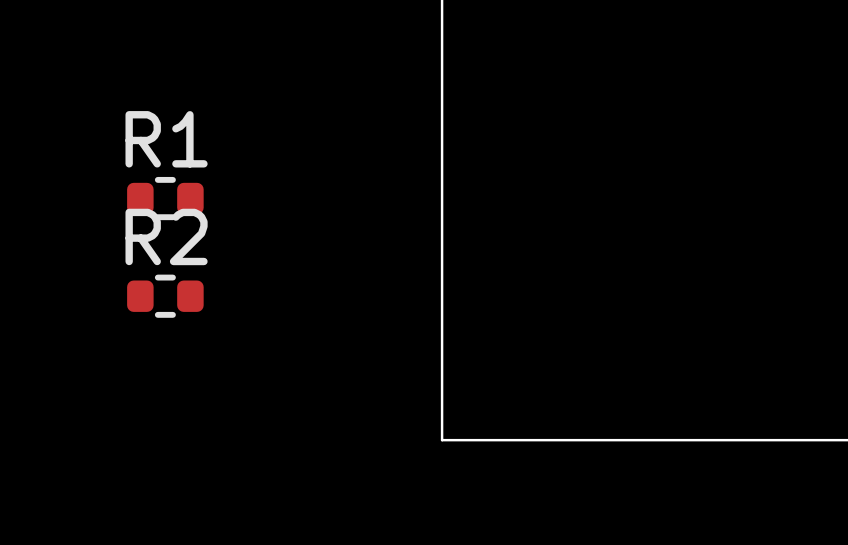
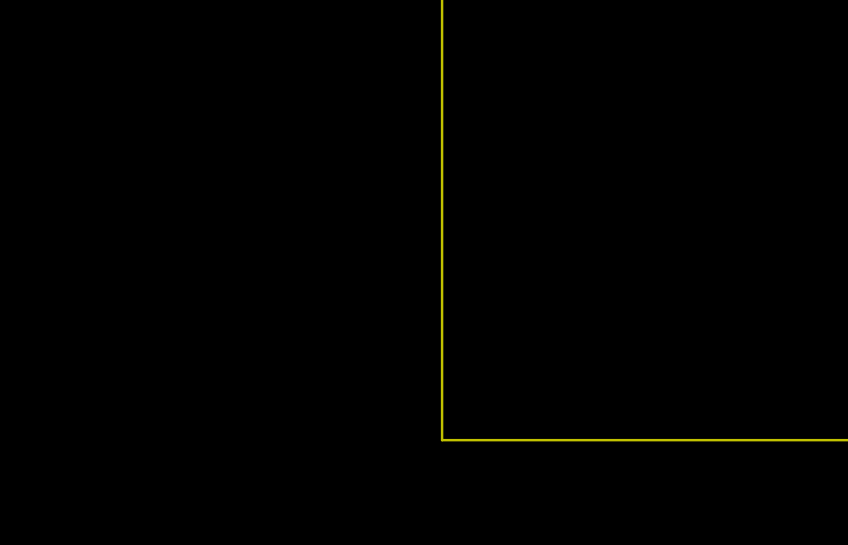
R1: (165, 198) -> none
R2: (165, 296) -> none

